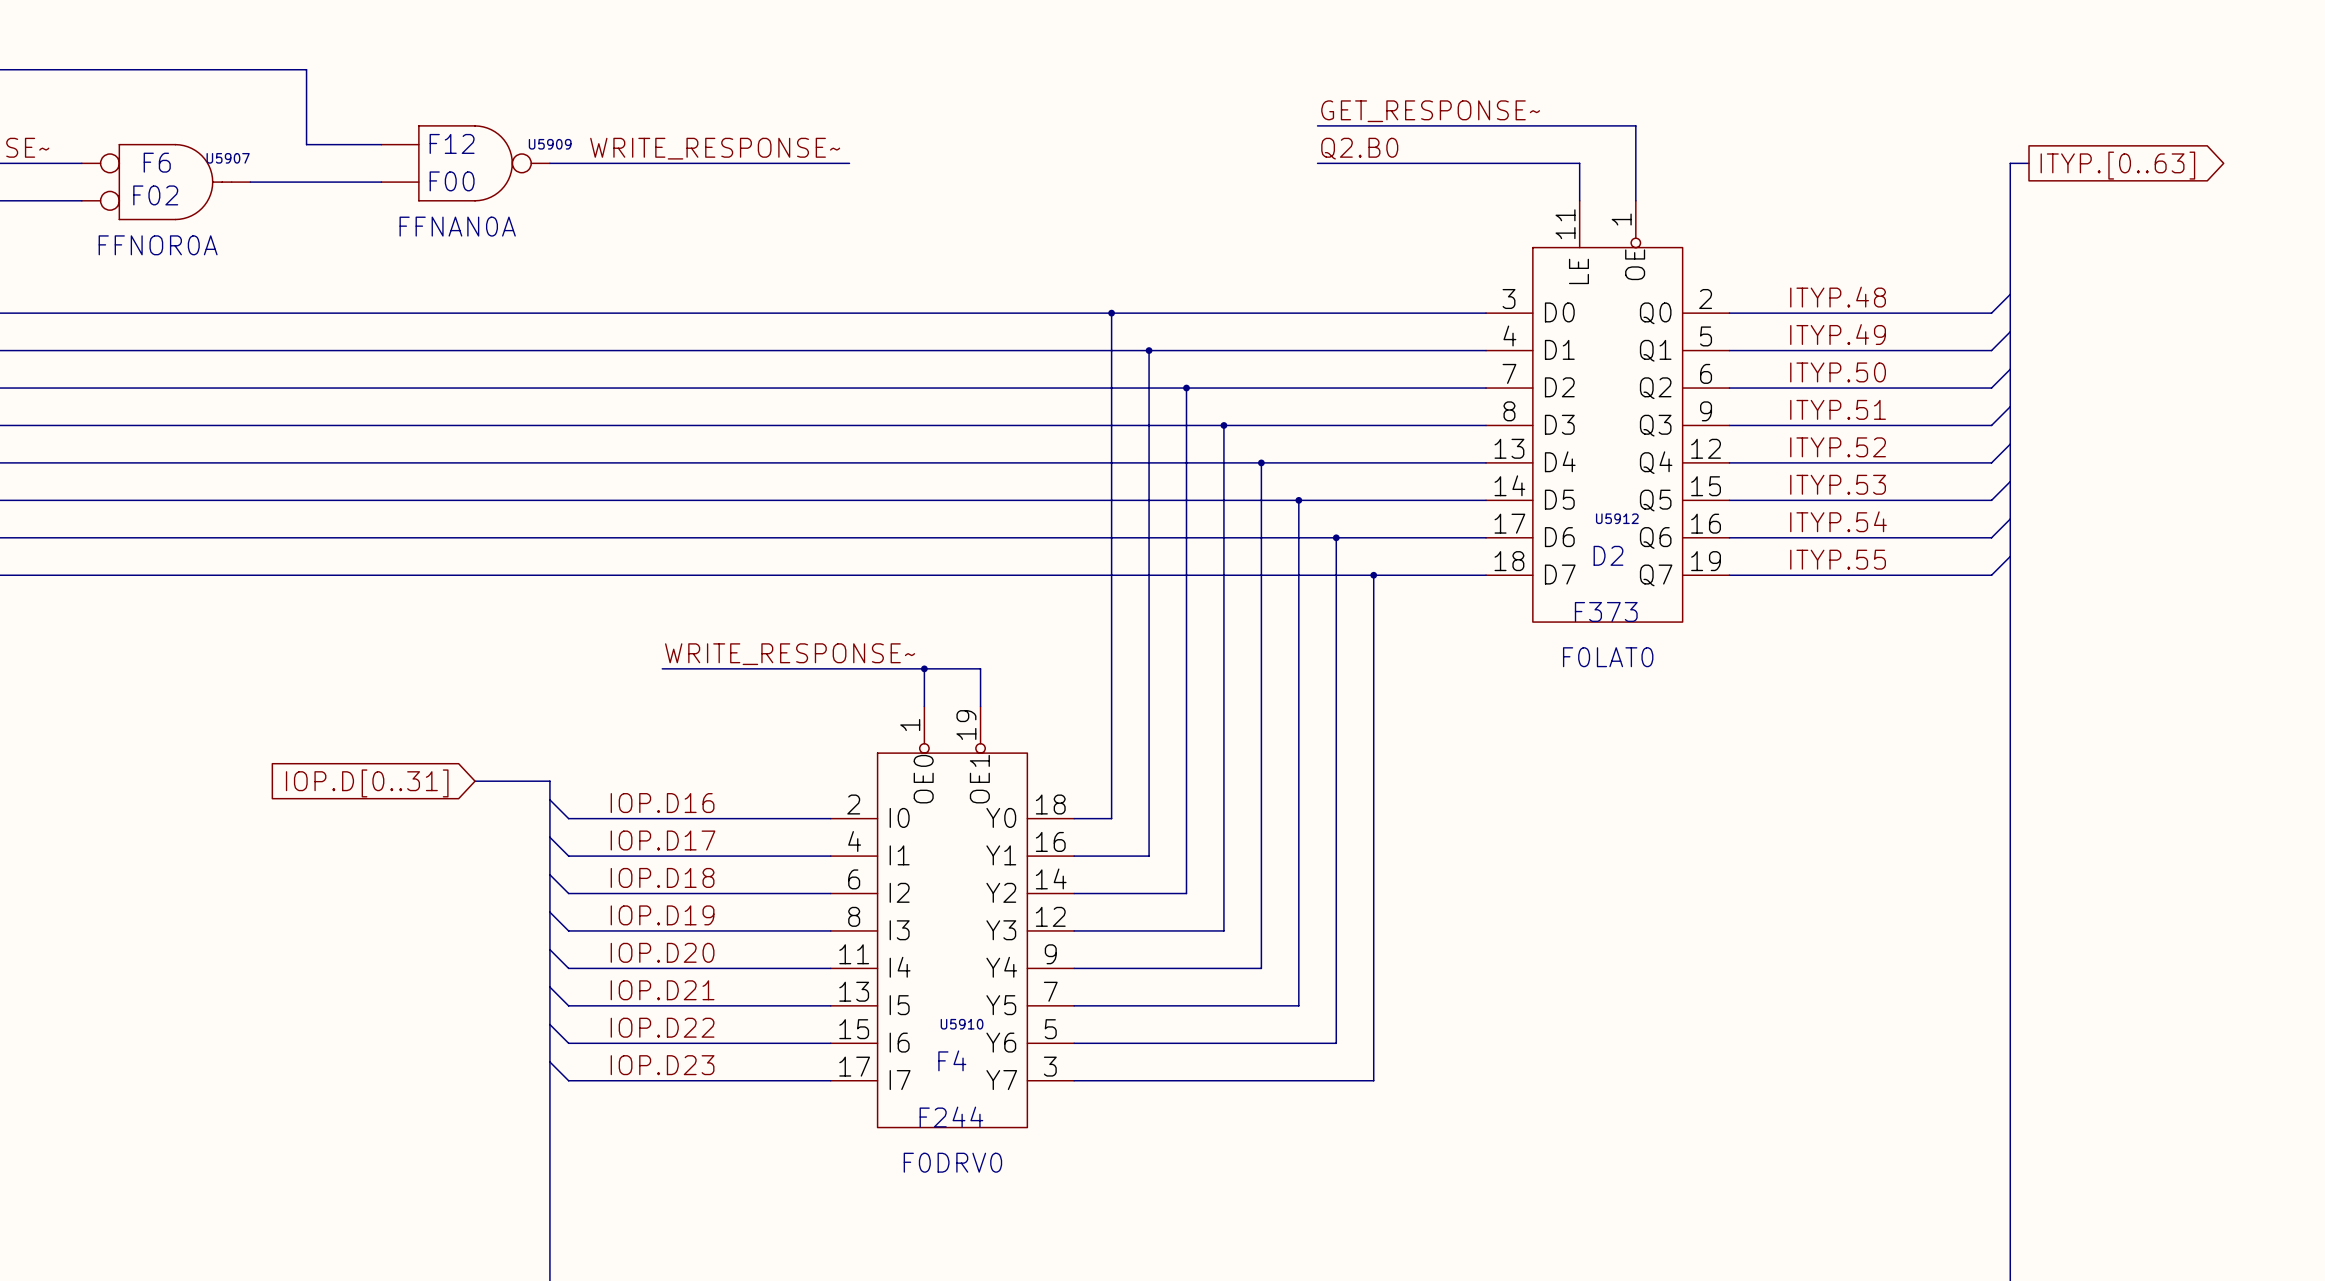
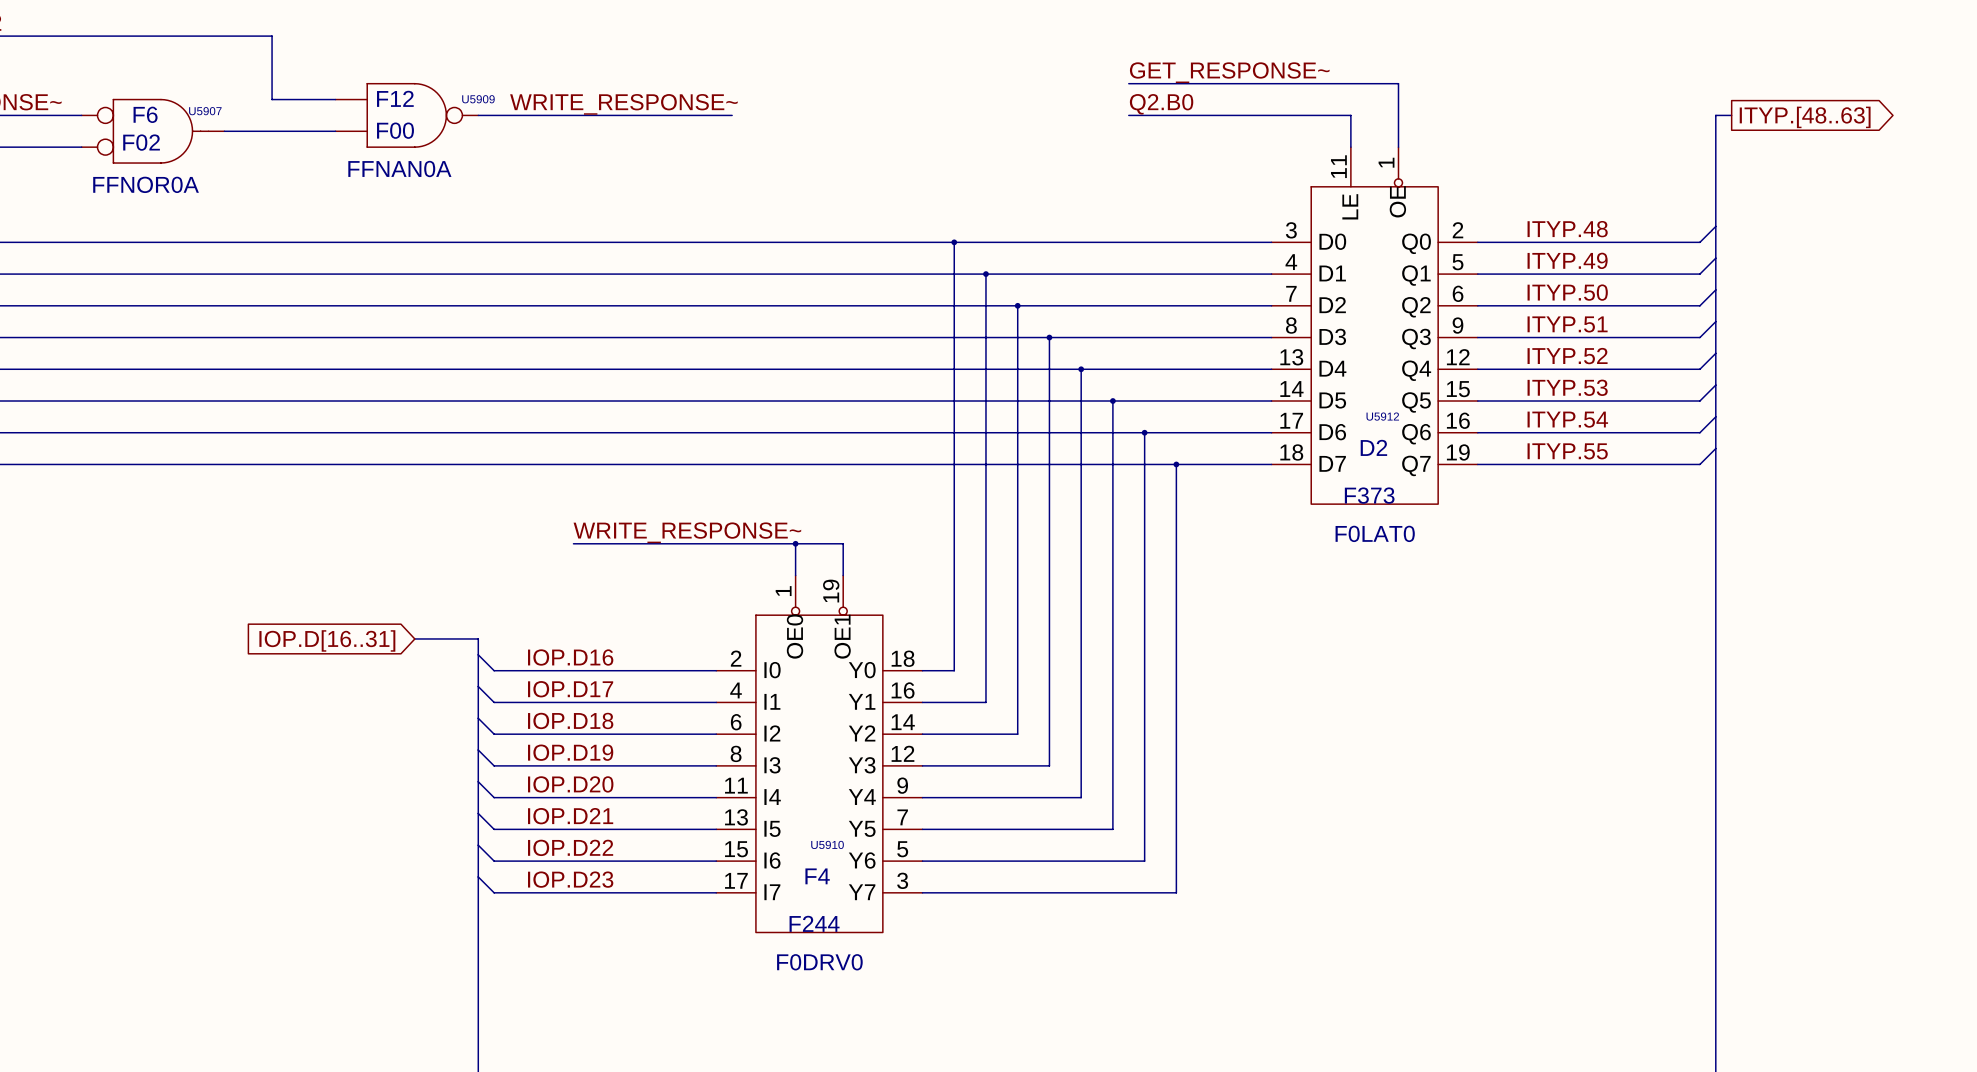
global label: ITYP.[0..63] (2117, 165) -> ITYP.[48..63] (1805, 117)
global label: IOP.D[0..31] (367, 783) -> IOP.D[16..31] (327, 640)

